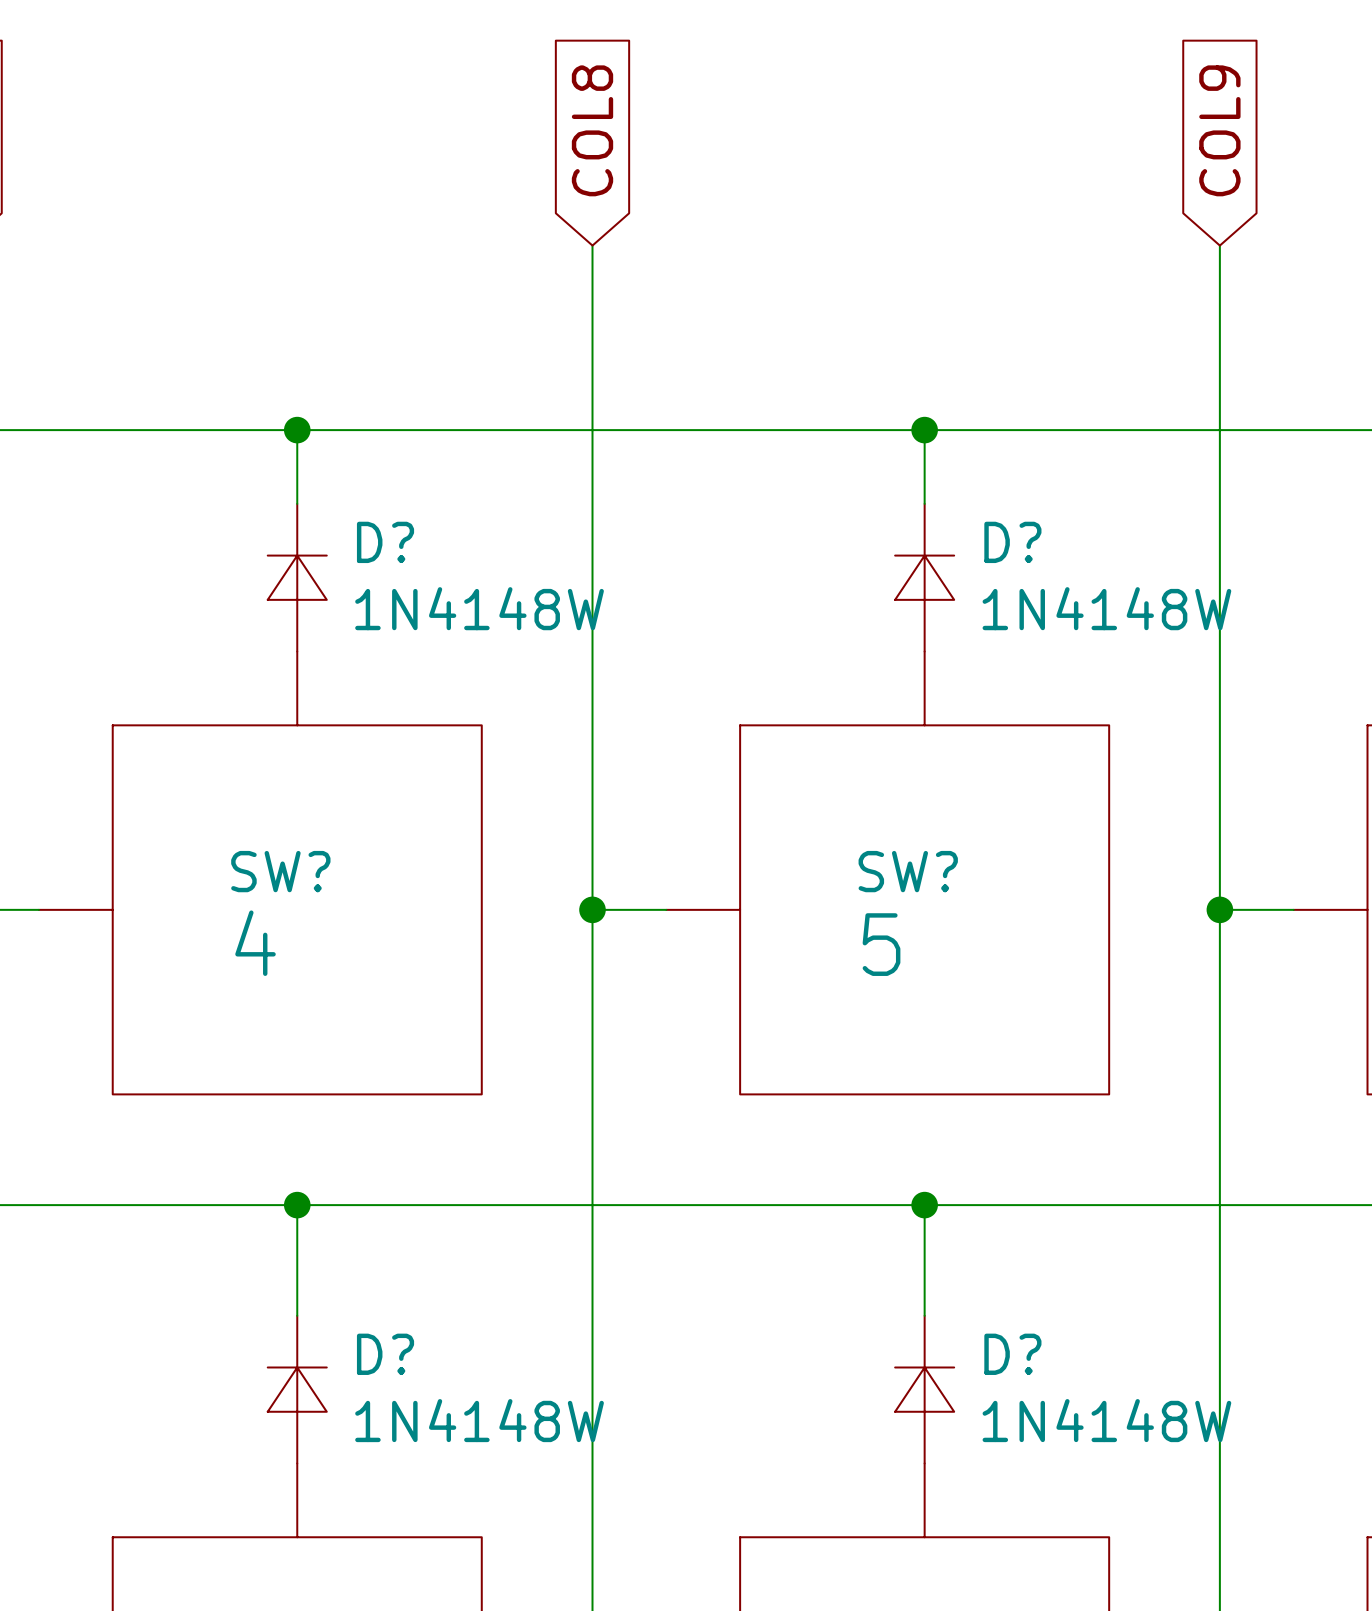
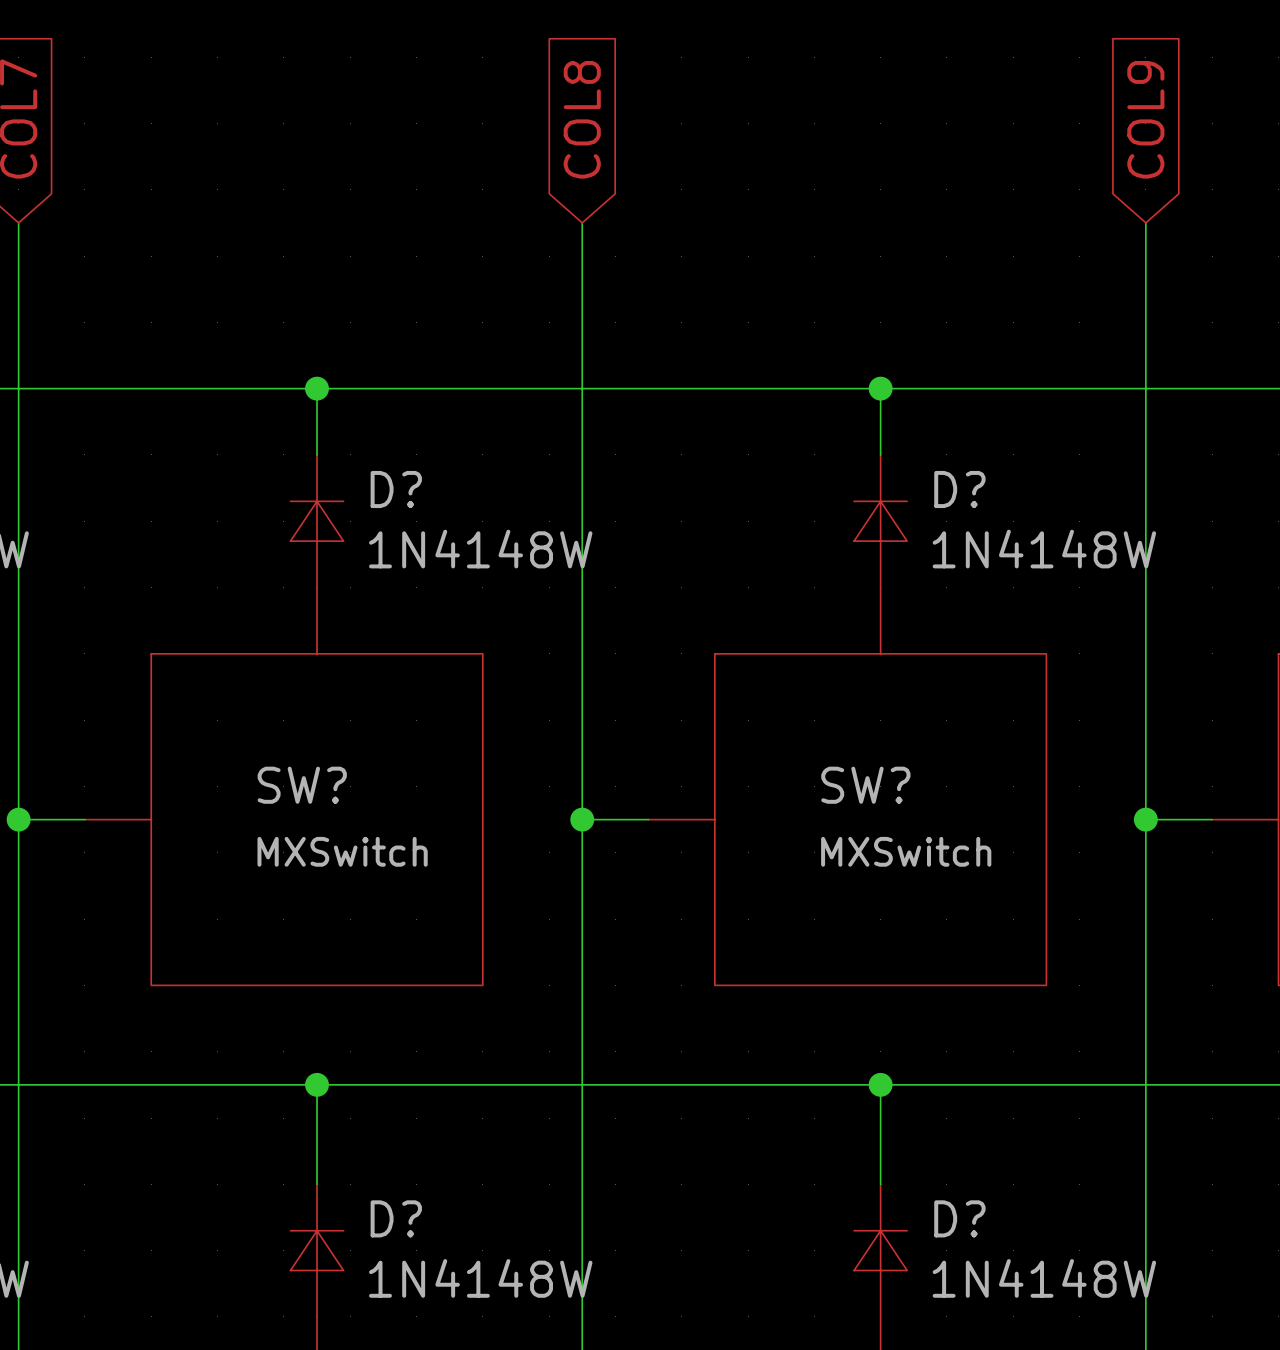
SW? value: 4 (255, 943) -> MXSwitch (342, 851)
SW? value: 5 (881, 944) -> MXSwitch (906, 851)

